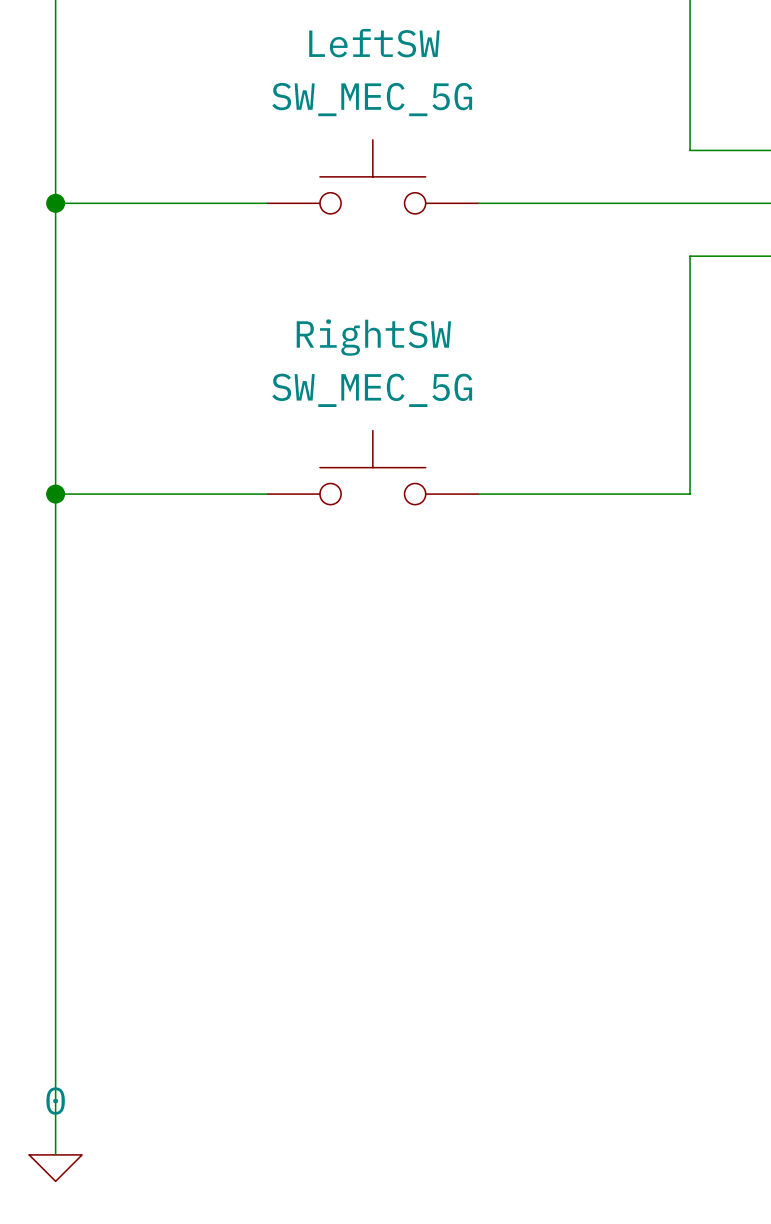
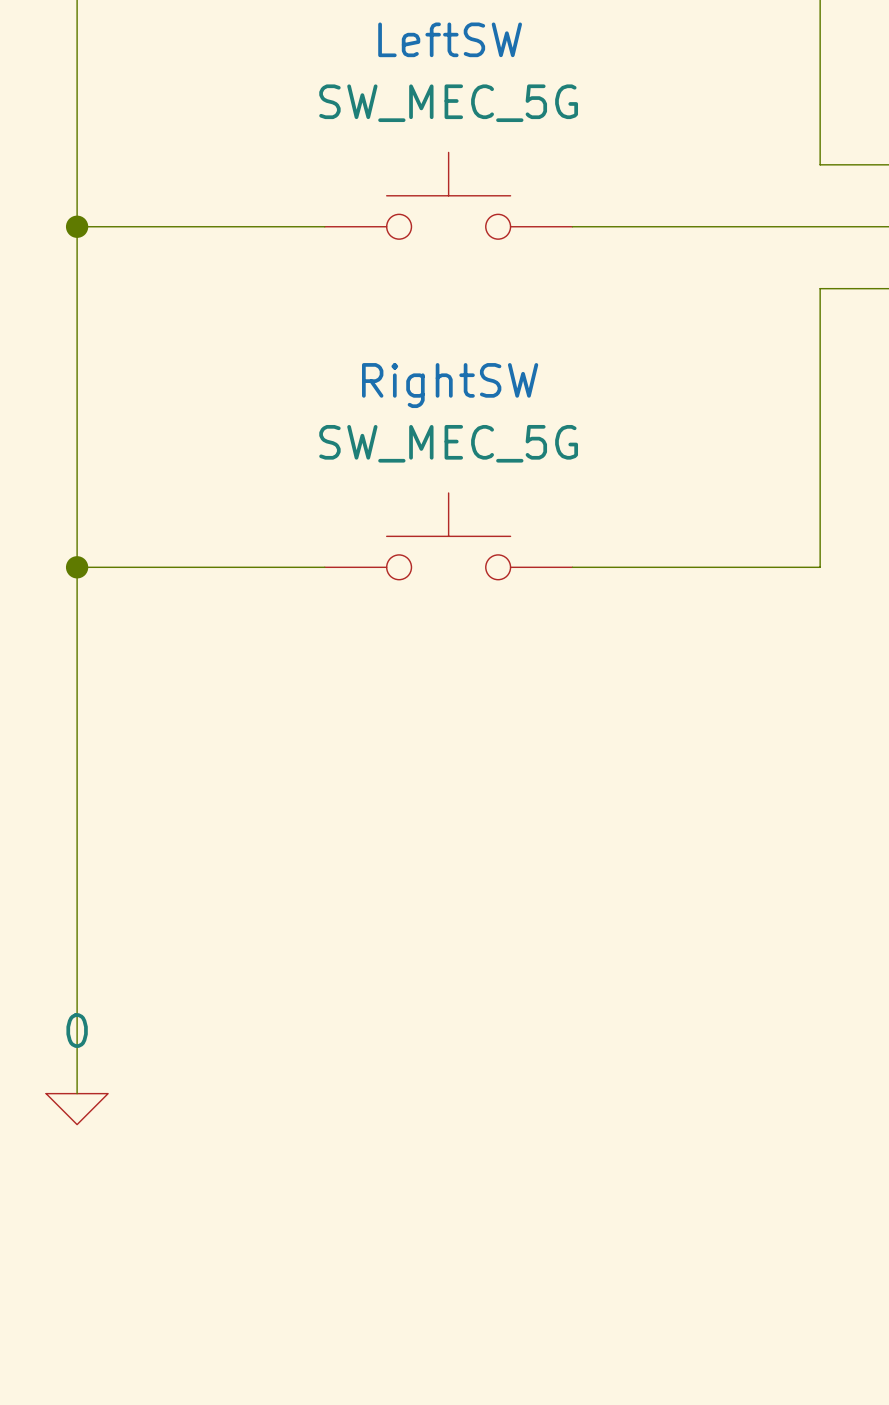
wire: (55, 943) (55, 1154) -> none
power symbol position: 0 (55, 1168) -> 0 (77, 1109)

